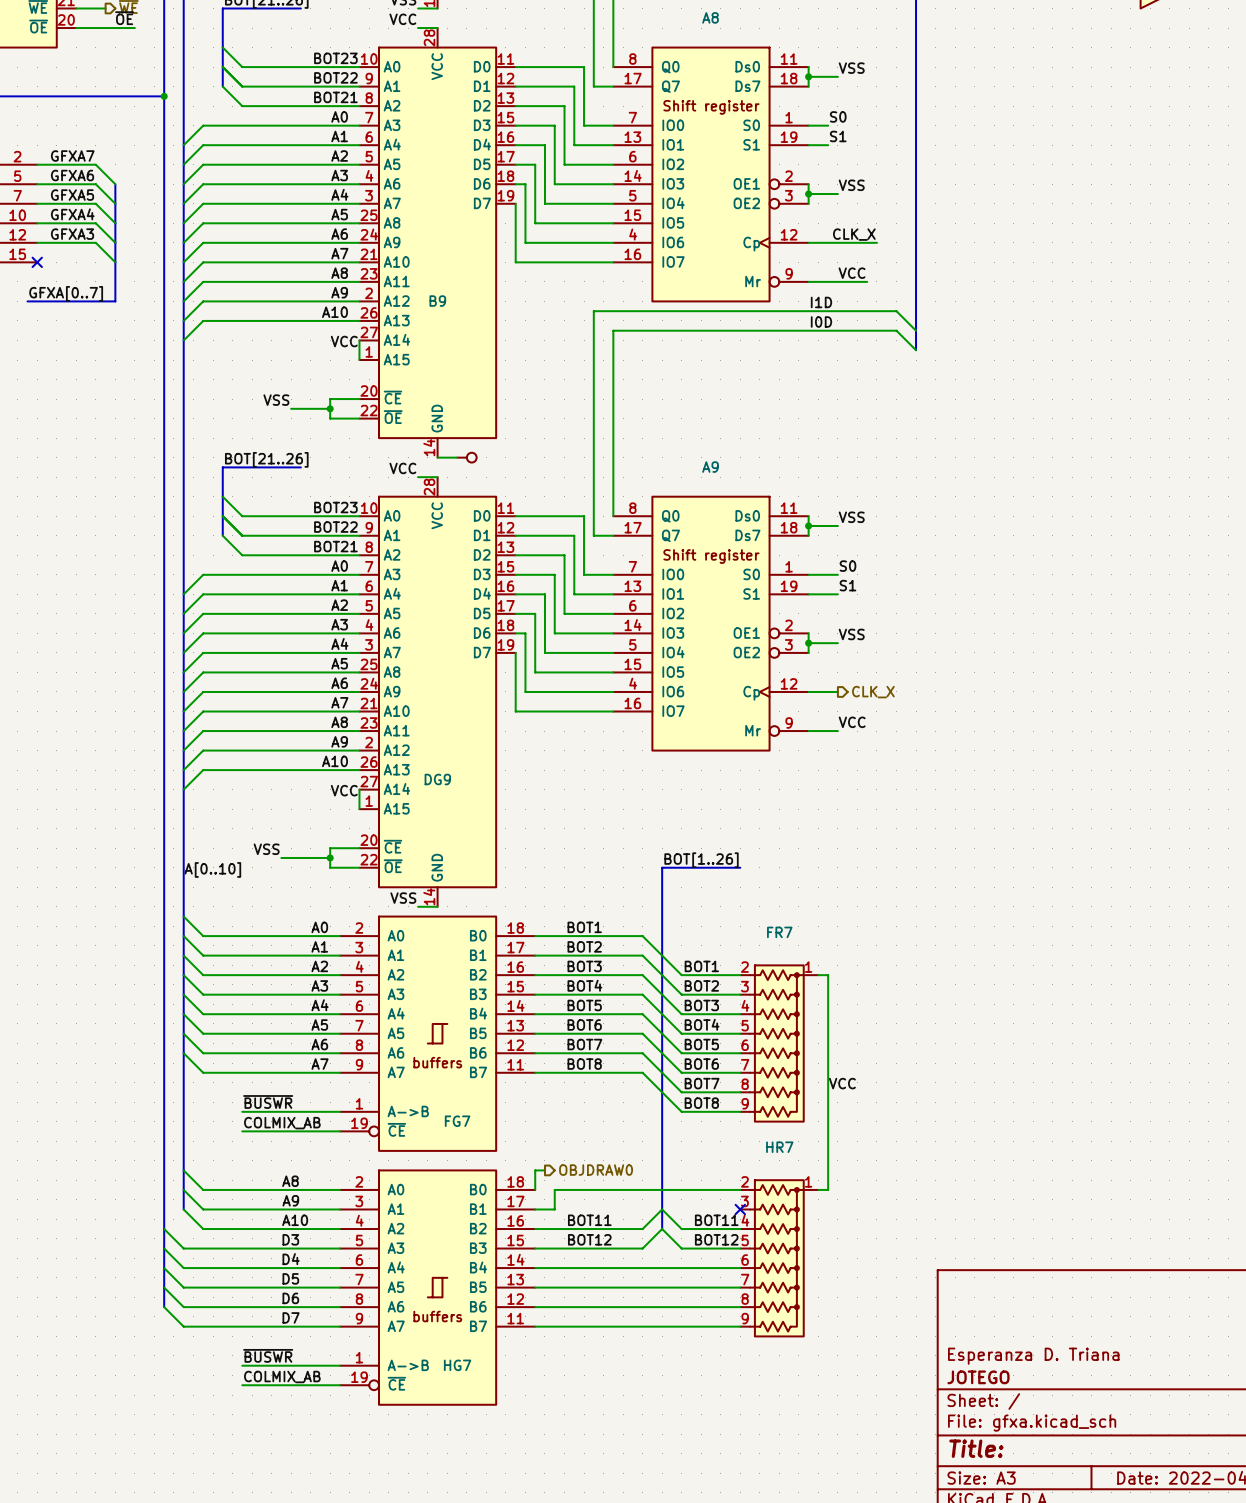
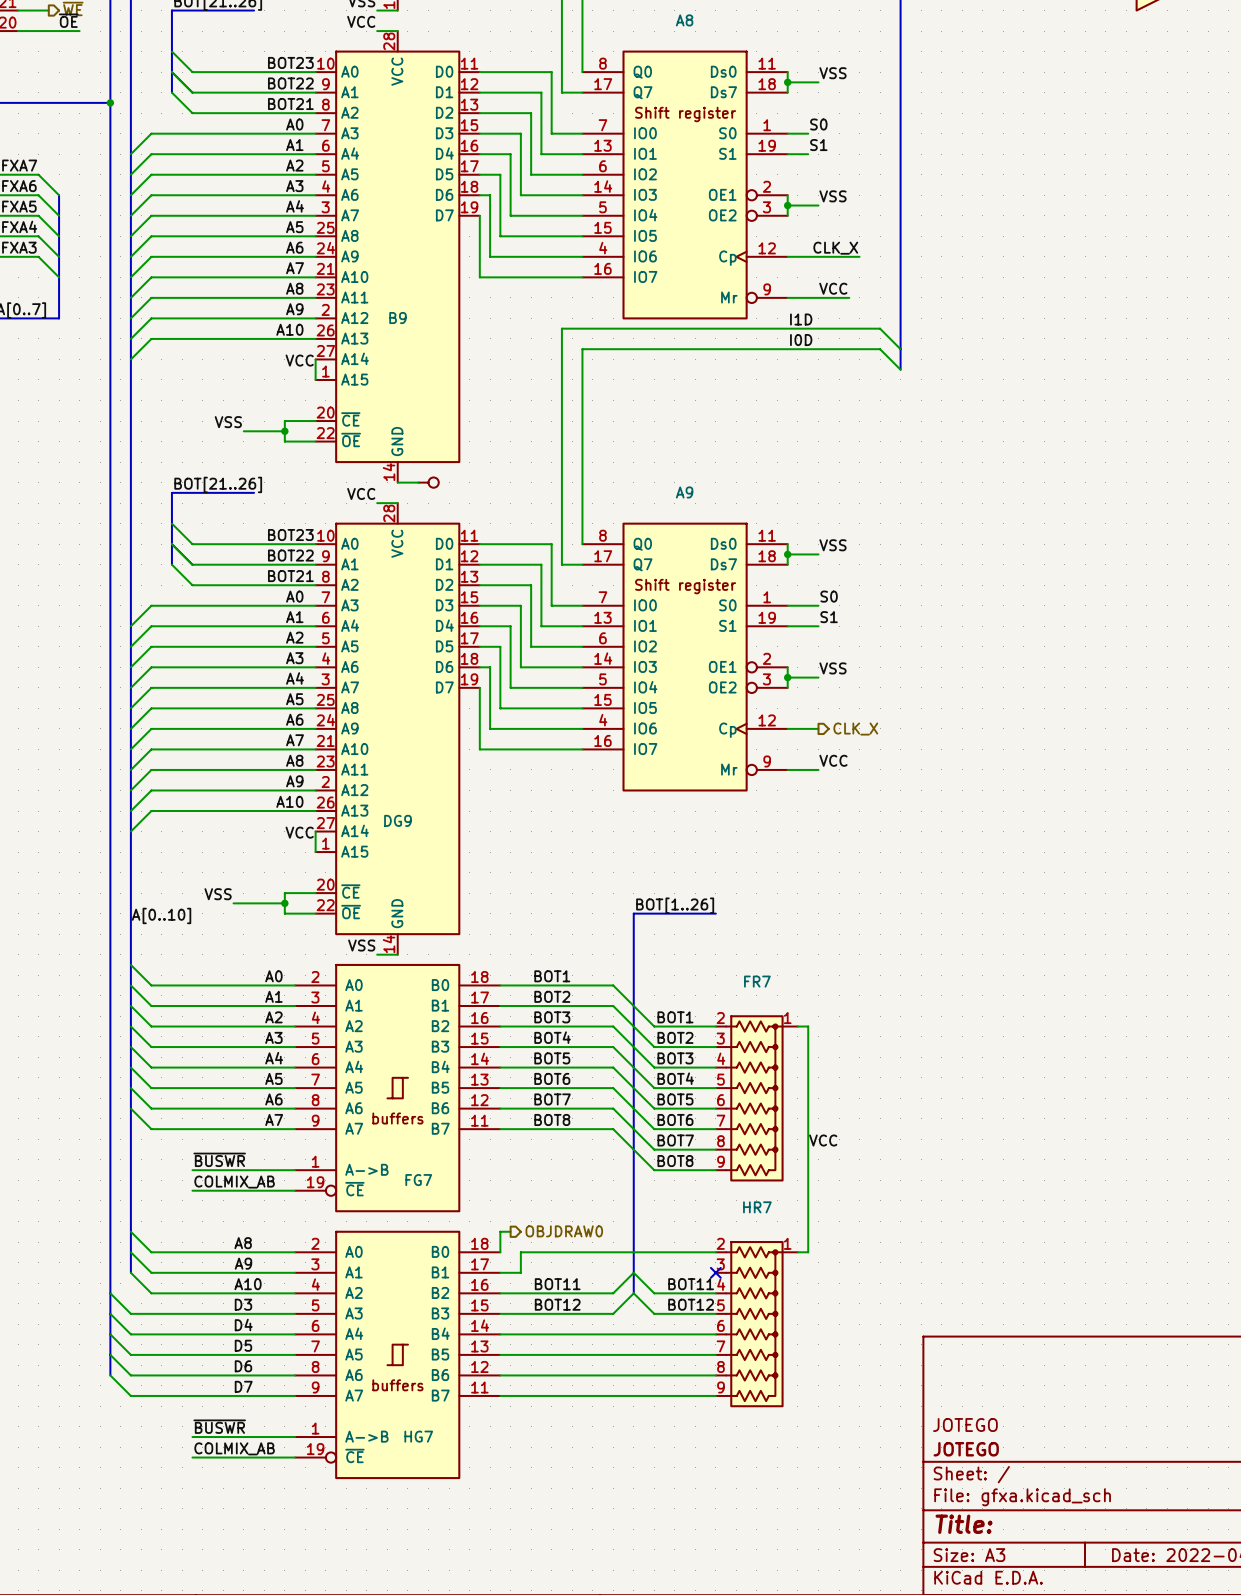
title block: Esperanza D. Triana (1033, 1356) -> JOTEGO (965, 1425)

